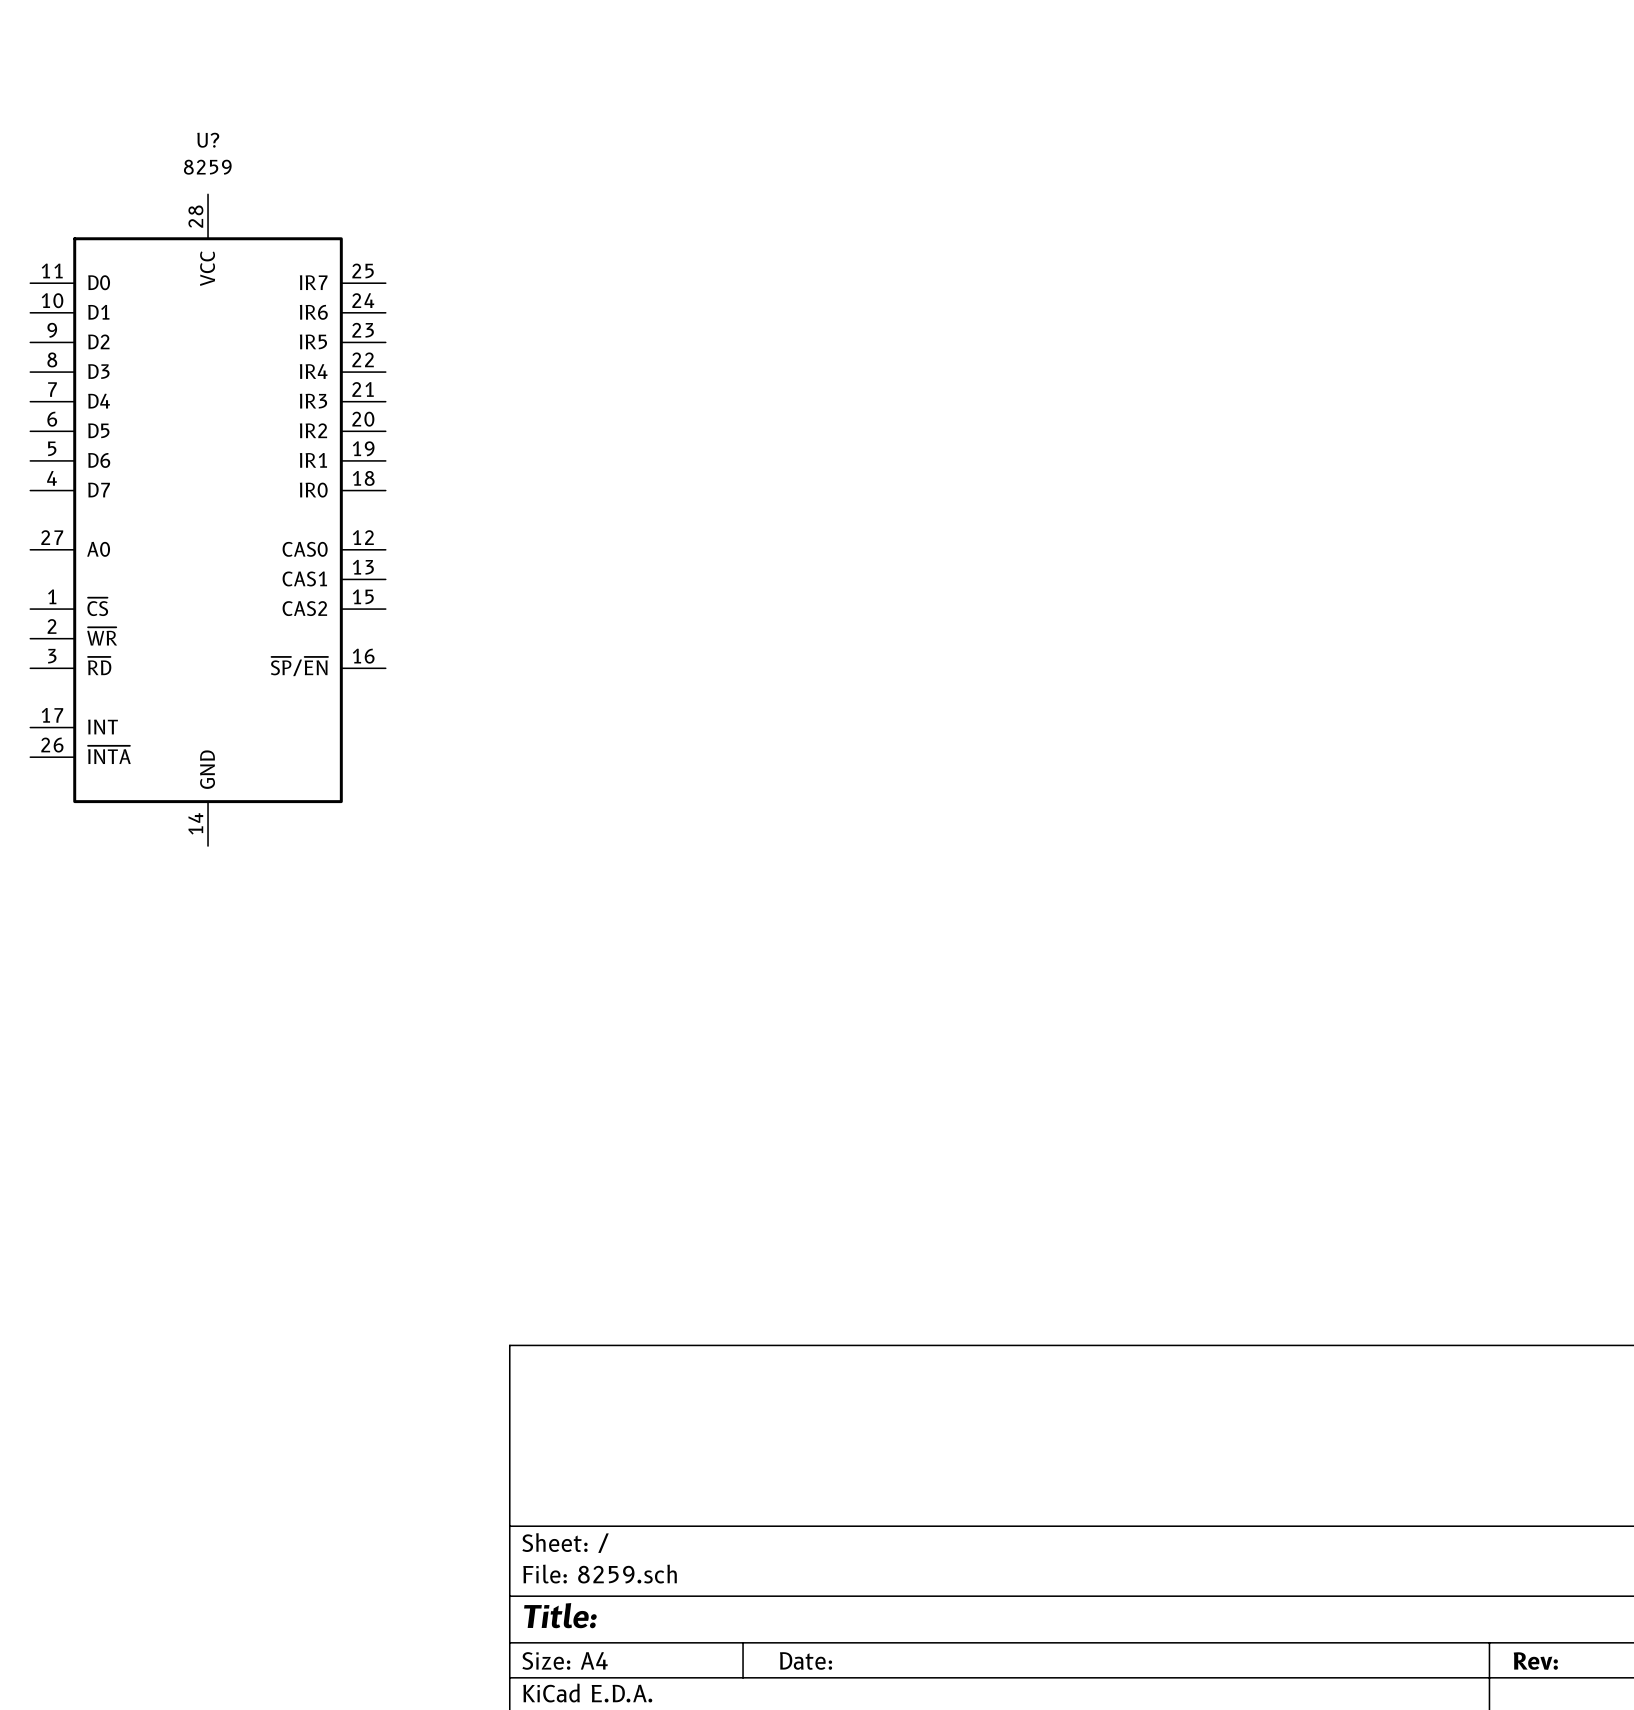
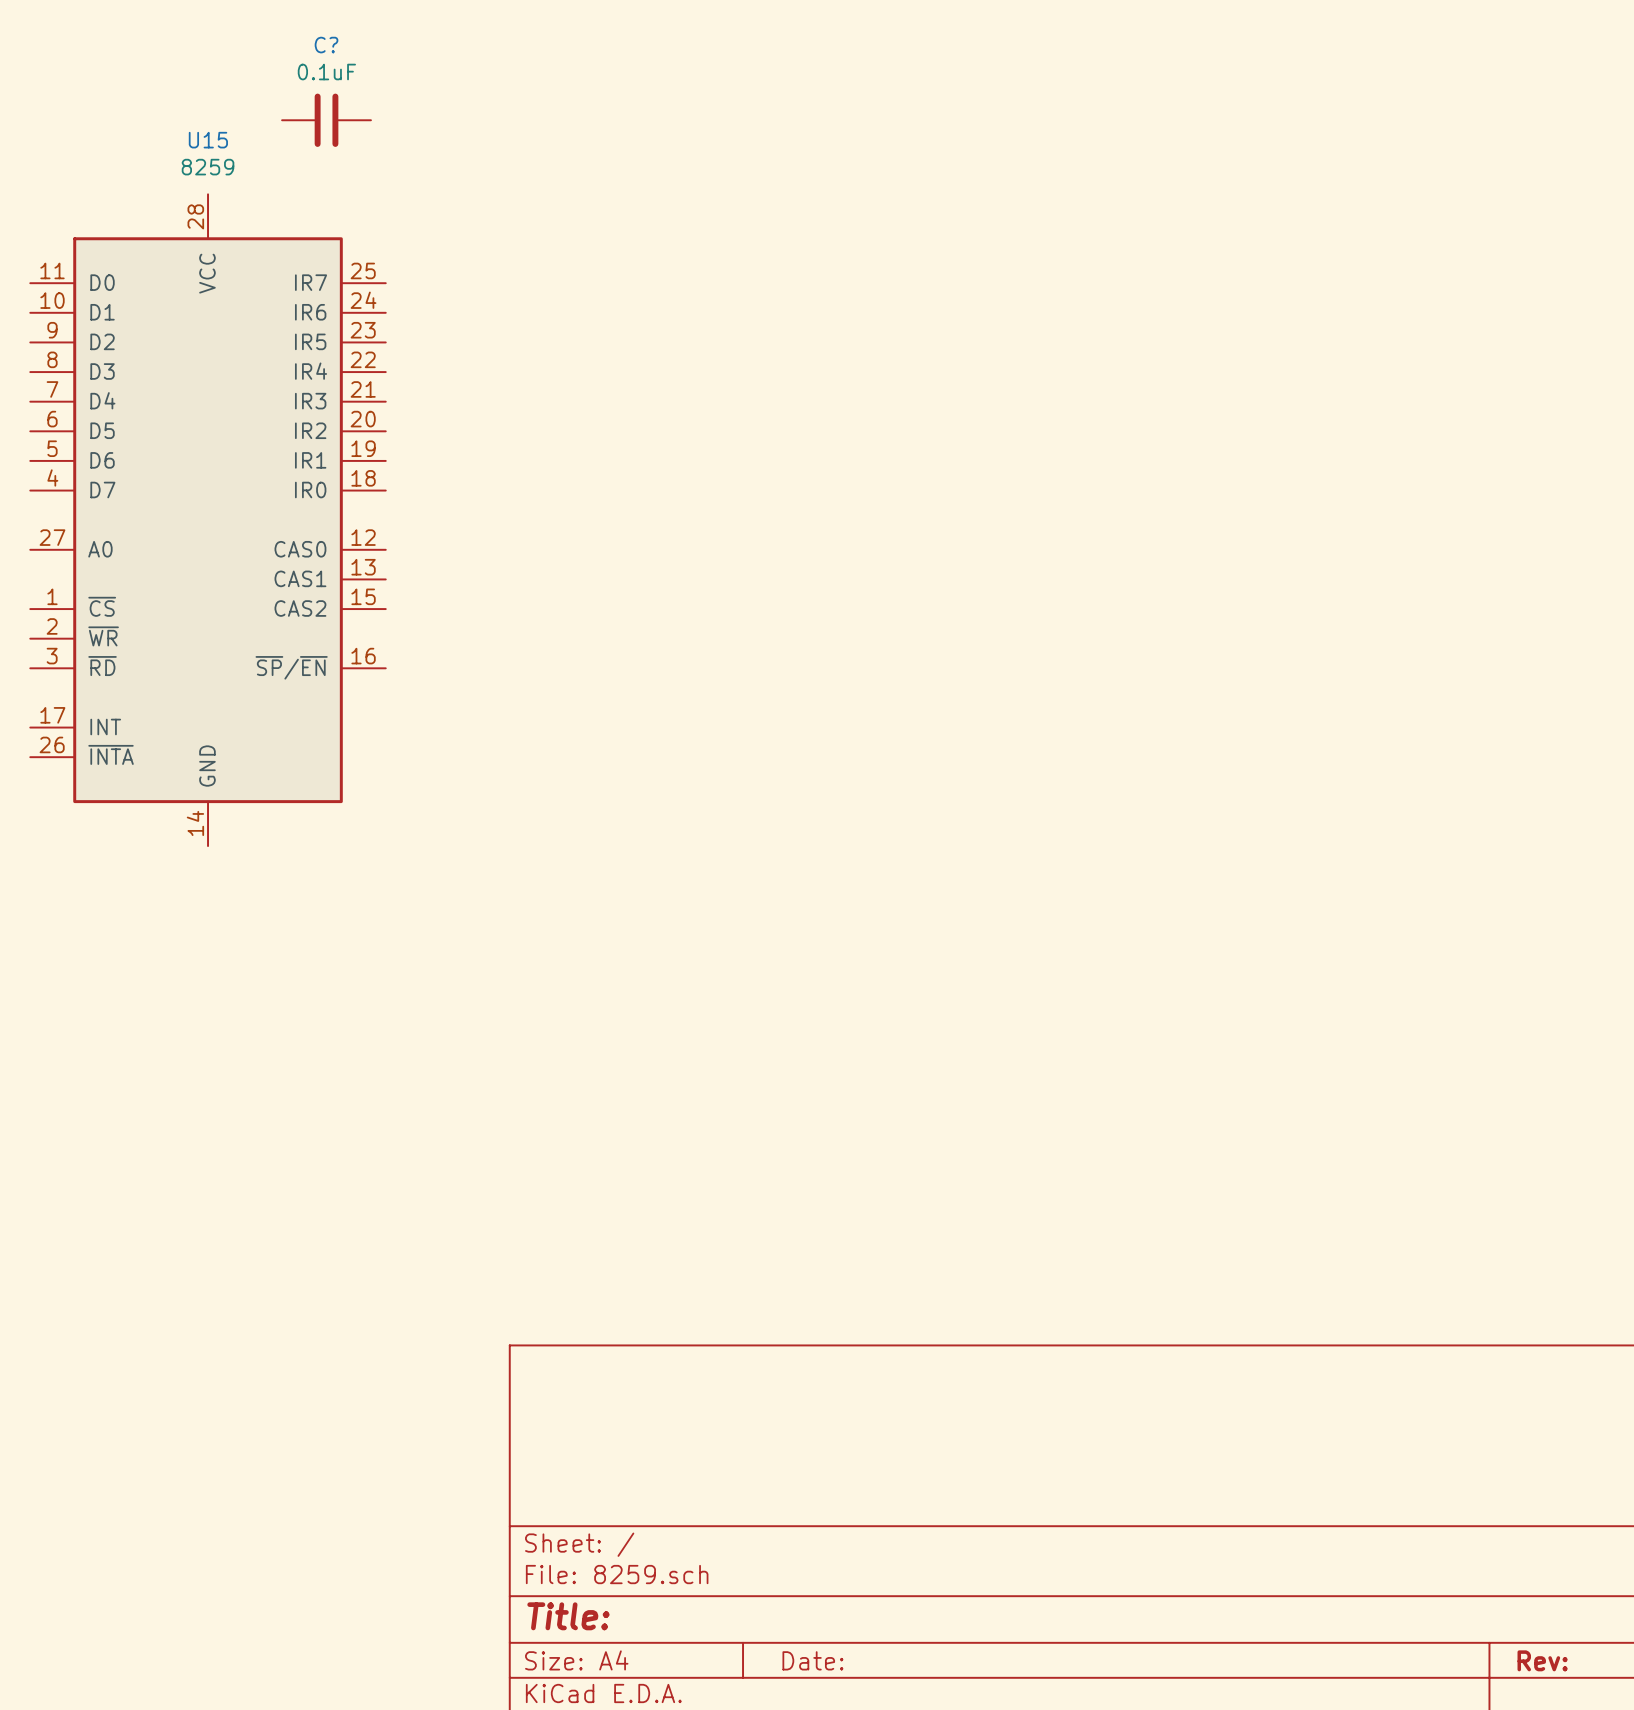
C?: none -> 0.1uF (326, 120)
U? name: U? (208, 140) -> U15 (208, 140)

